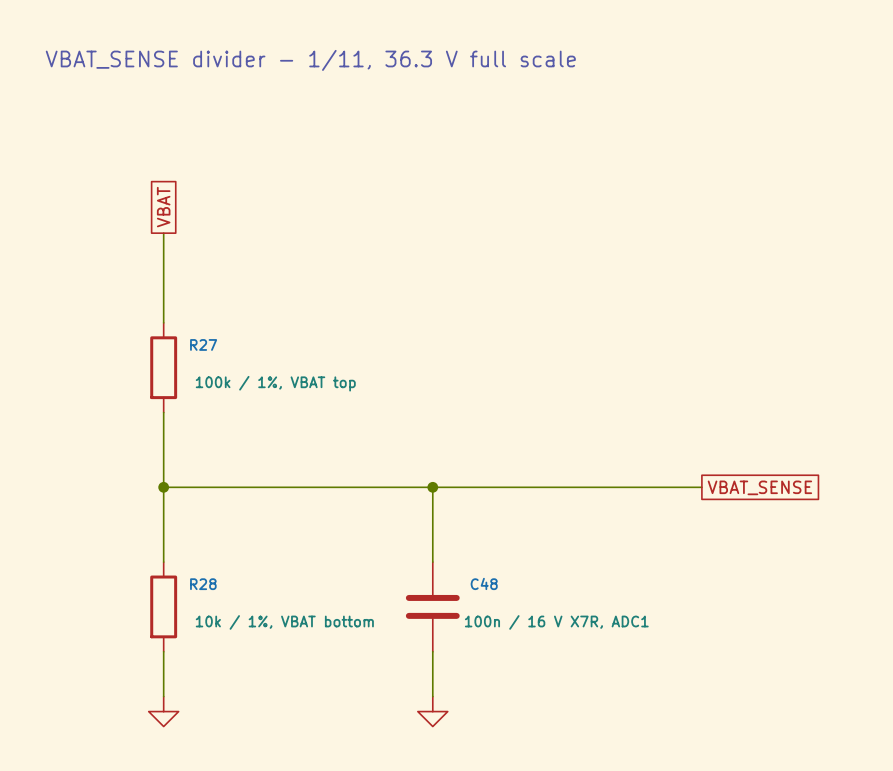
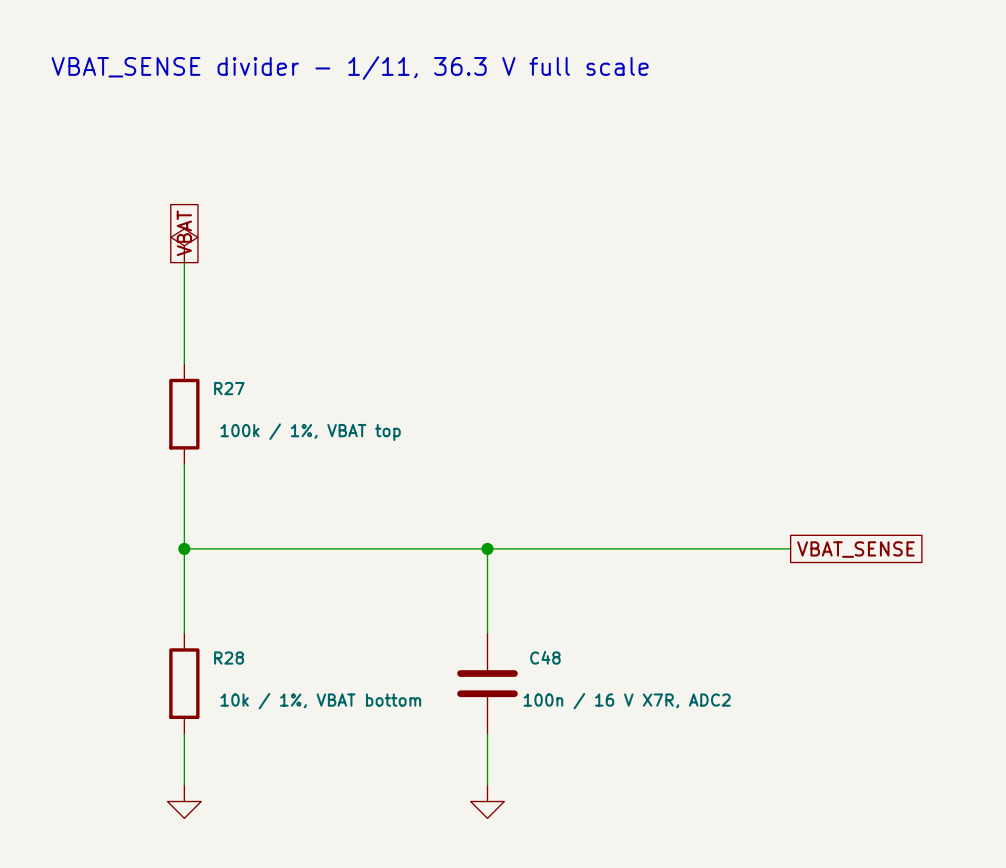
power symbol: none -> (184, 245)
C48 value: 100n / 16 V X7R, ADC1 (556, 622) -> 100n / 16 V X7R, ADC2 (627, 701)

